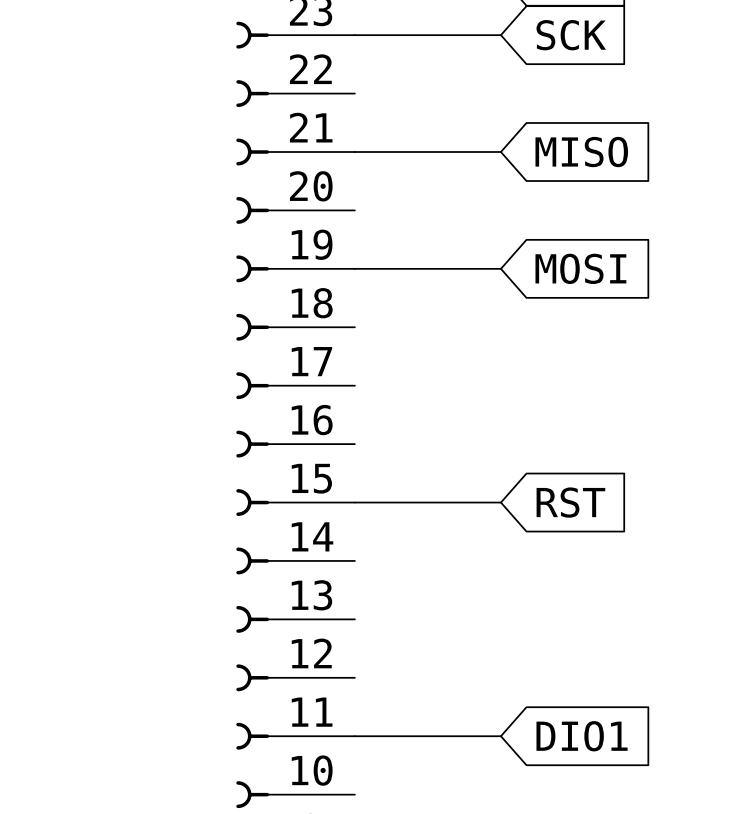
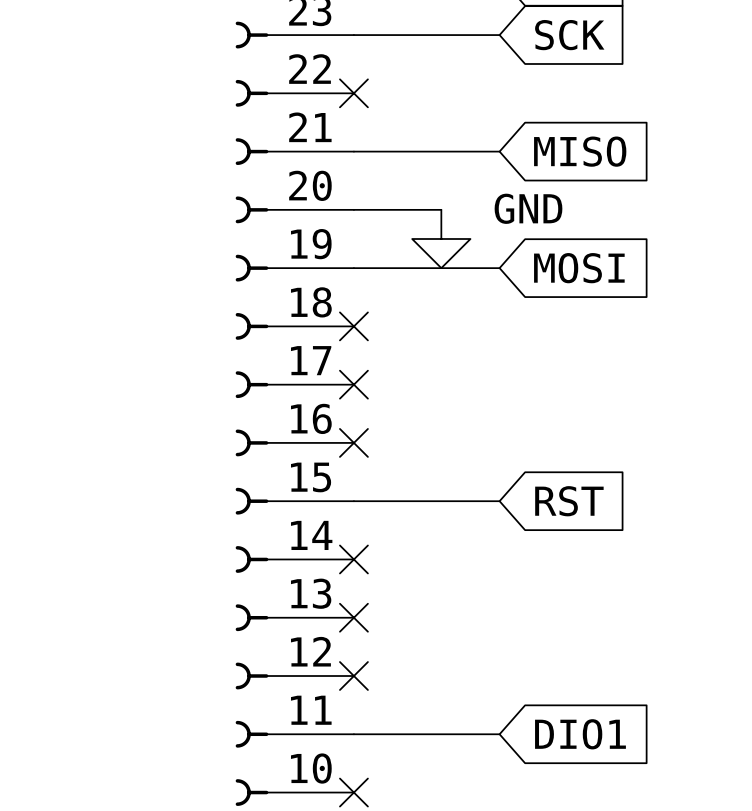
no-connect mark: none -> (353, 93)
wire: none -> (353, 209) (441, 209)
power symbol: none -> GND (441, 239)
no-connect mark: none -> (353, 326)
no-connect mark: none -> (353, 384)
no-connect mark: none -> (353, 442)
no-connect mark: none -> (353, 559)
no-connect mark: none -> (353, 617)
no-connect mark: none -> (353, 676)
no-connect mark: none -> (353, 792)

